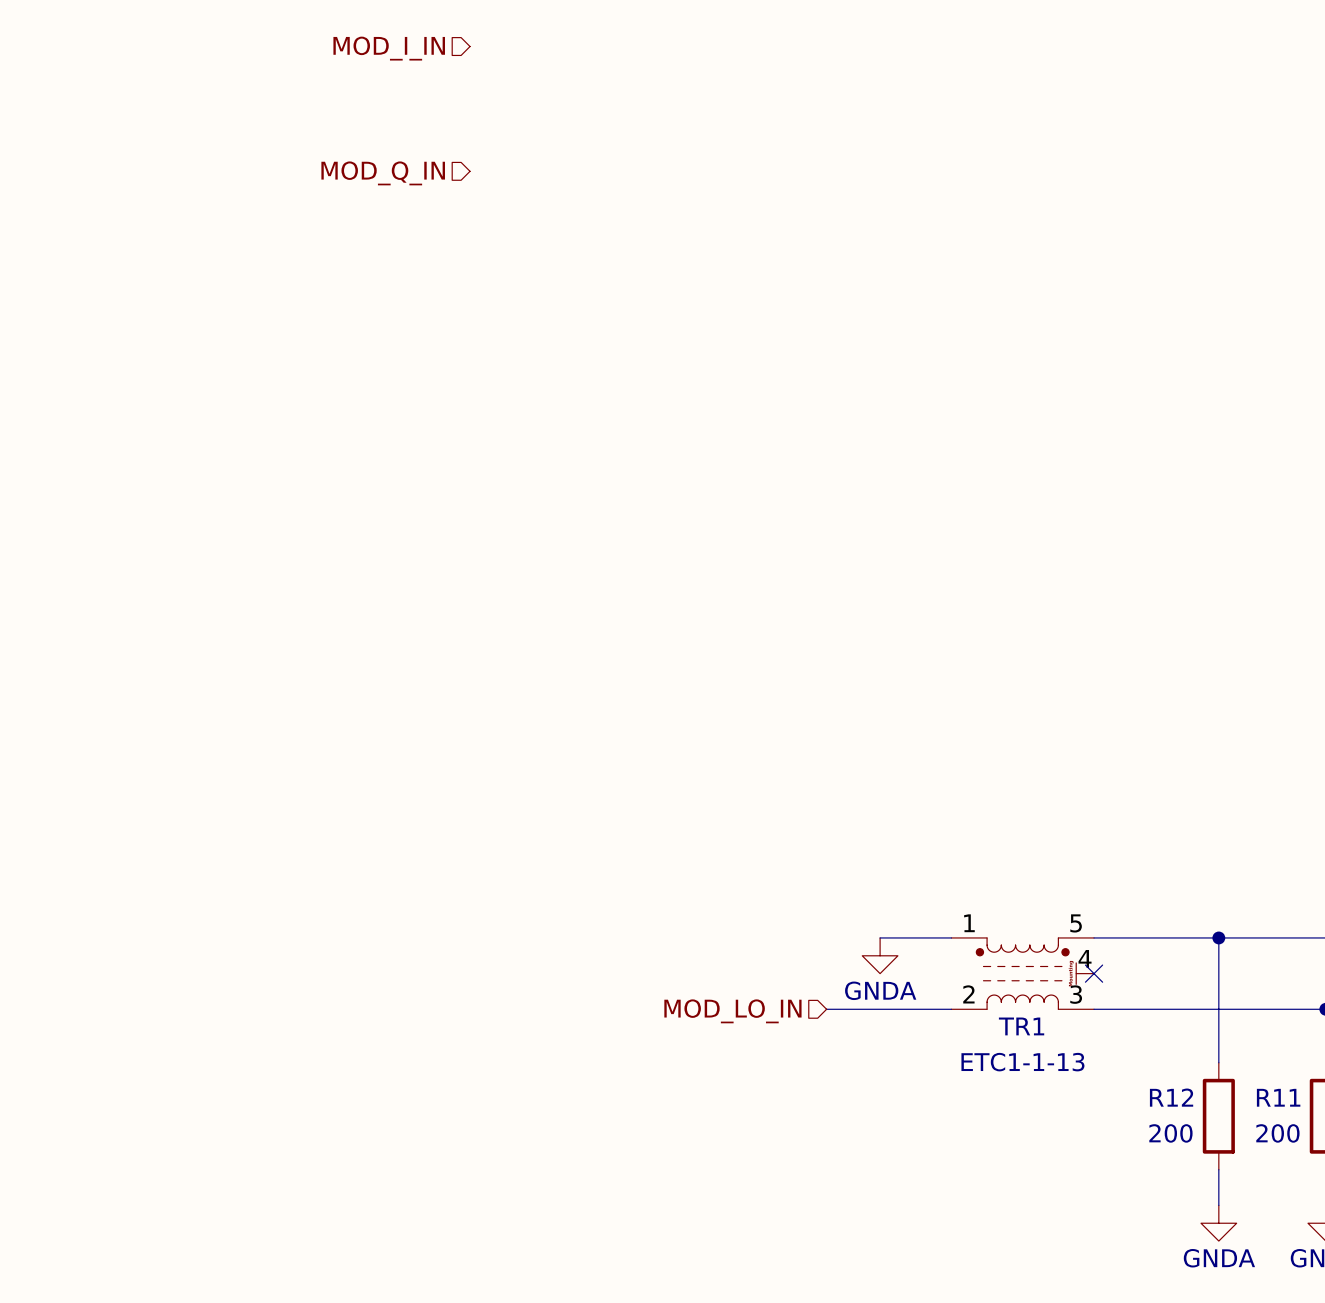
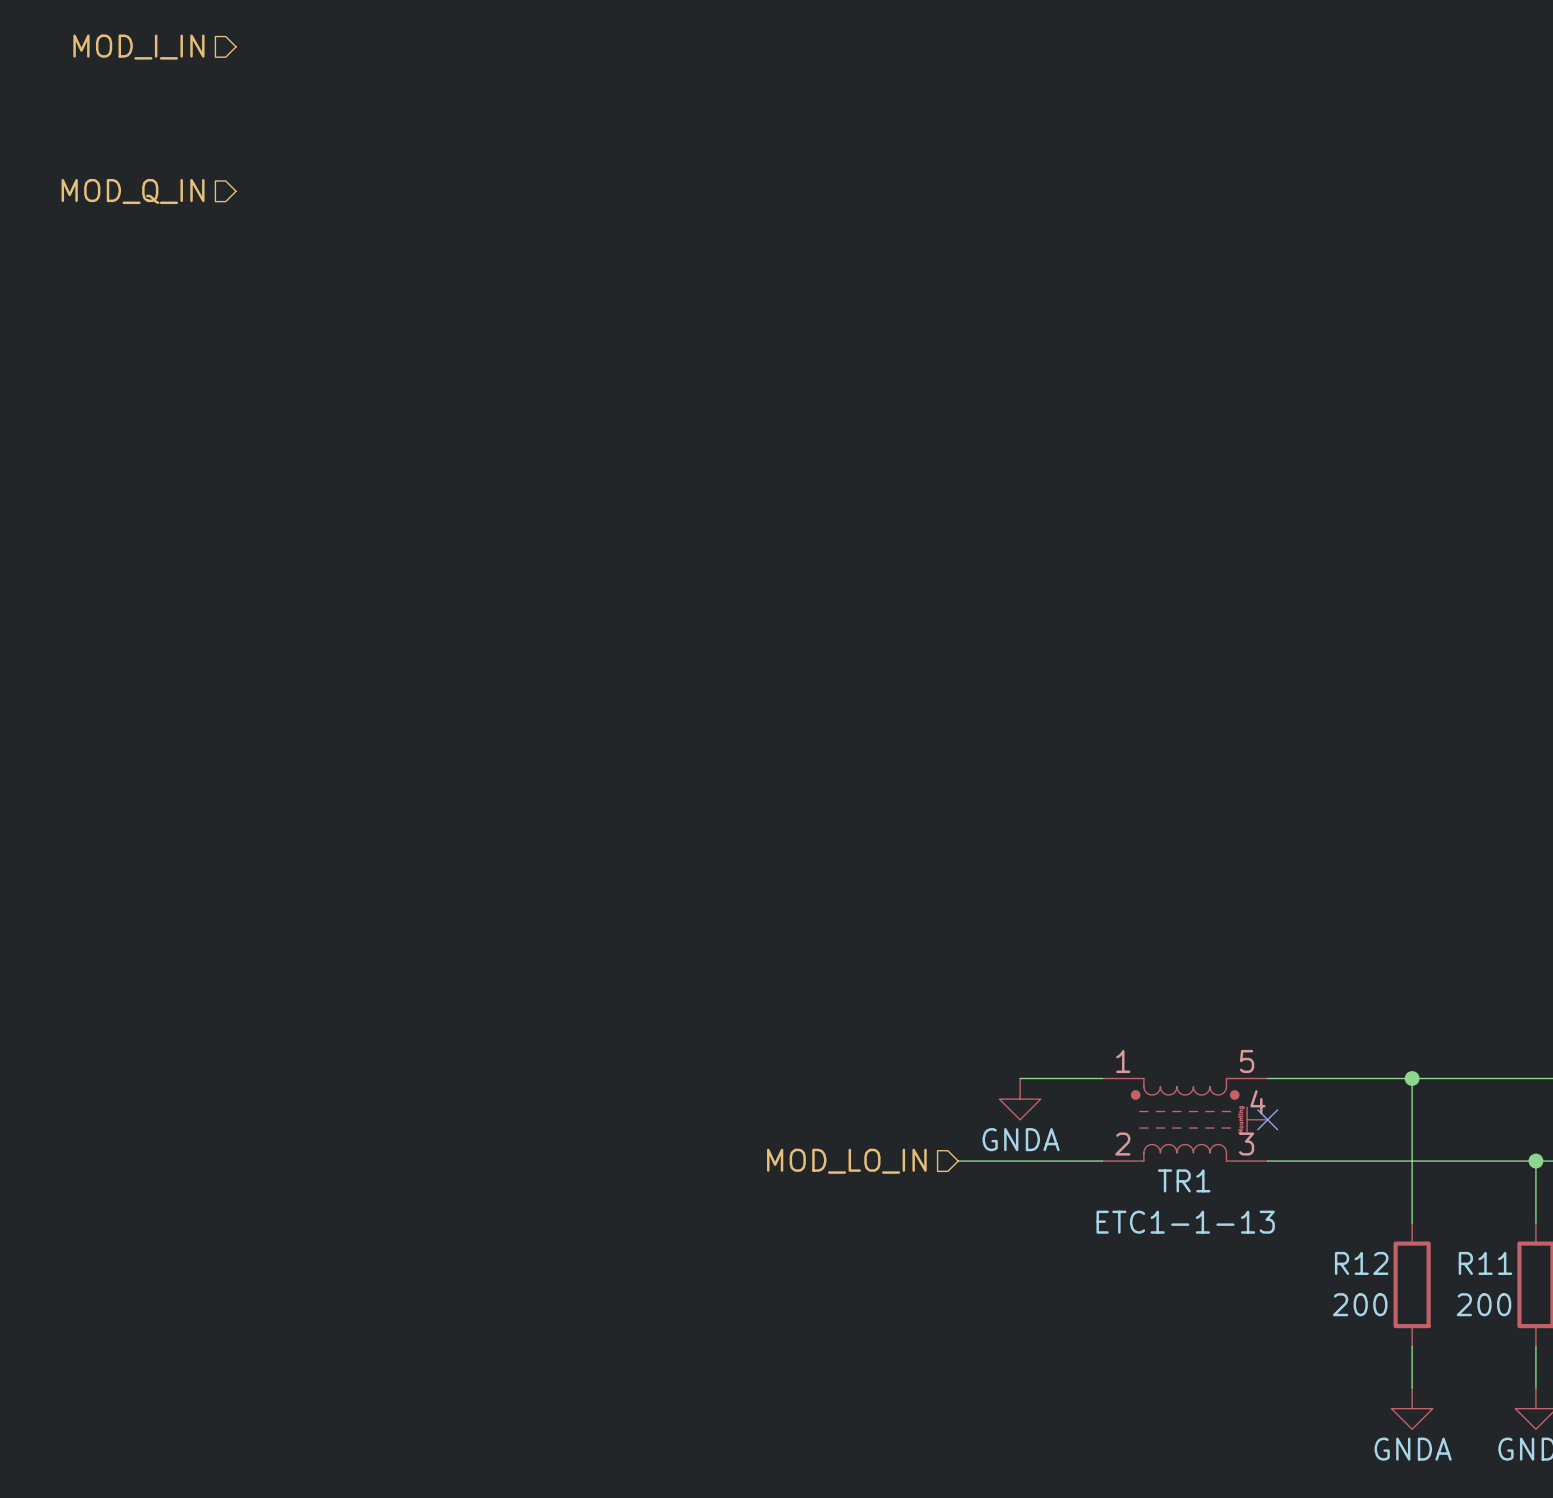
hierarchical label position: MOD_I_IN (389, 48) -> MOD_I_IN (138, 47)
hierarchical label position: MOD_Q_IN (383, 173) -> MOD_Q_IN (133, 191)

